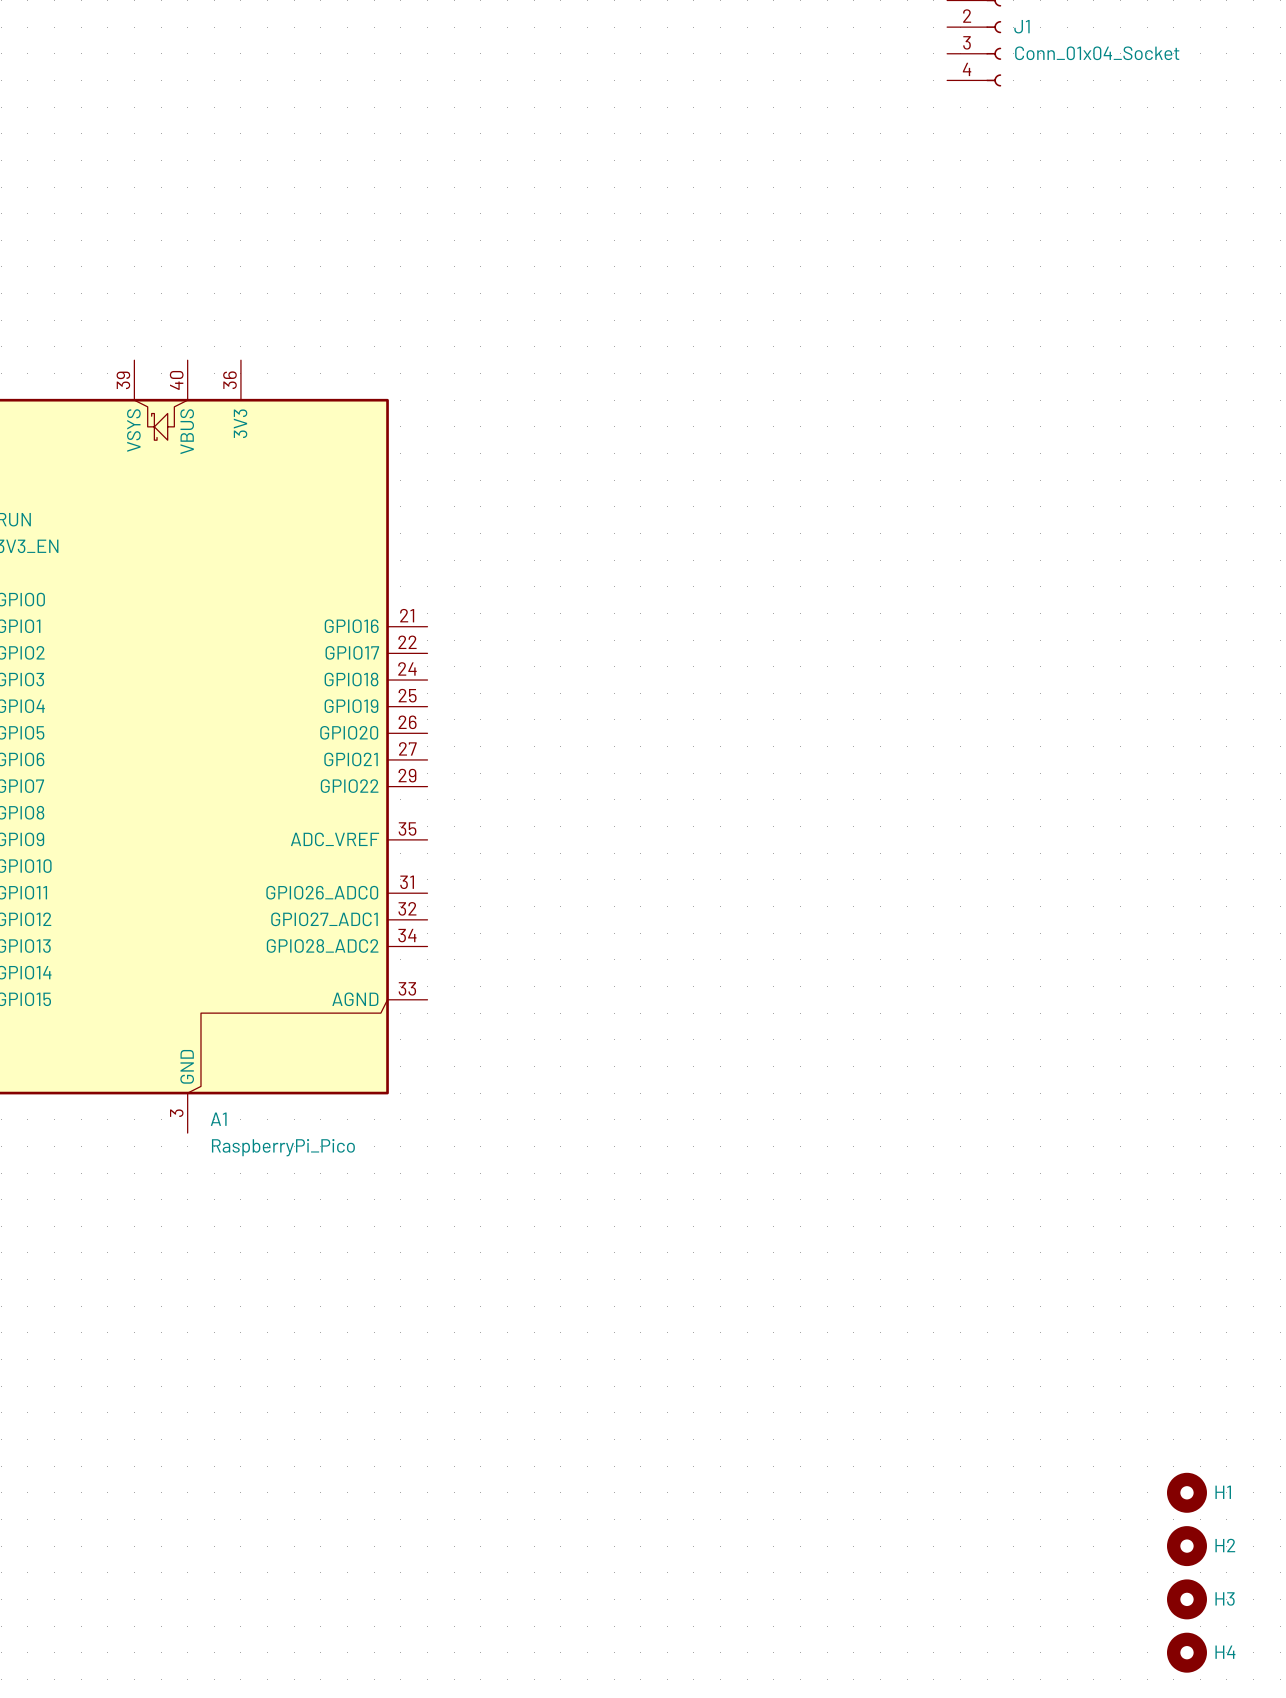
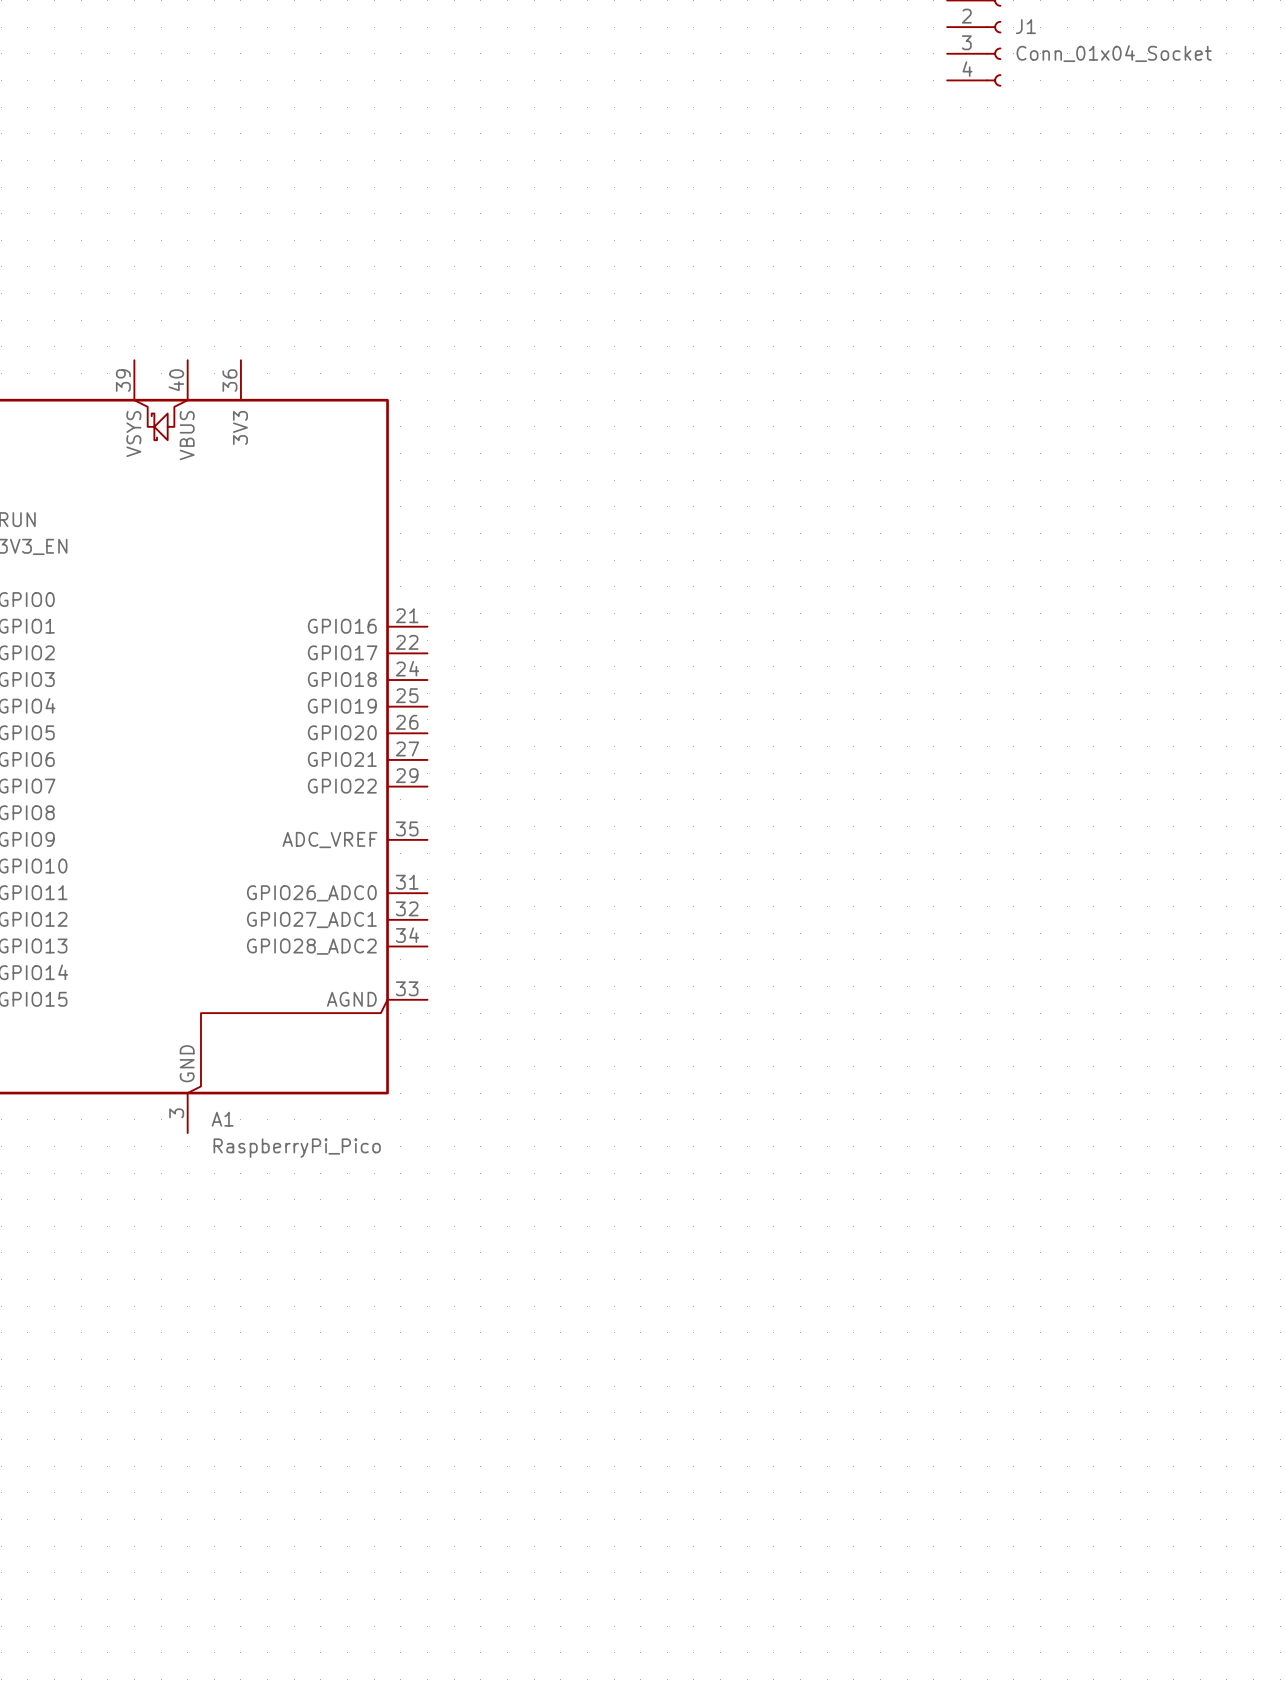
H1: (1186, 1492) -> none
H2: (1186, 1546) -> none
H3: (1186, 1599) -> none
H4: (1186, 1652) -> none

